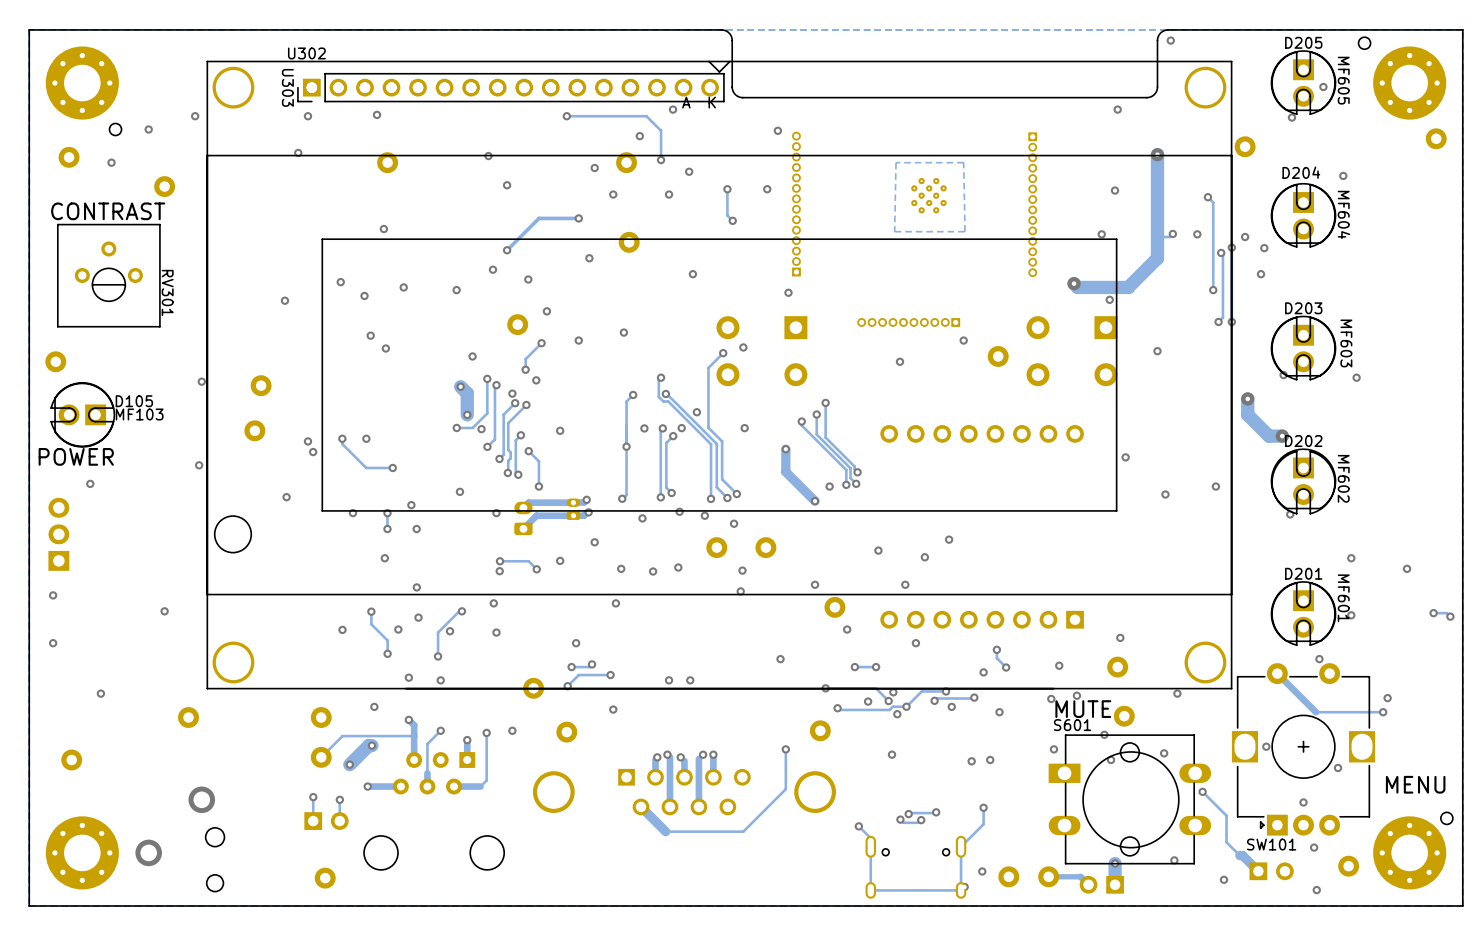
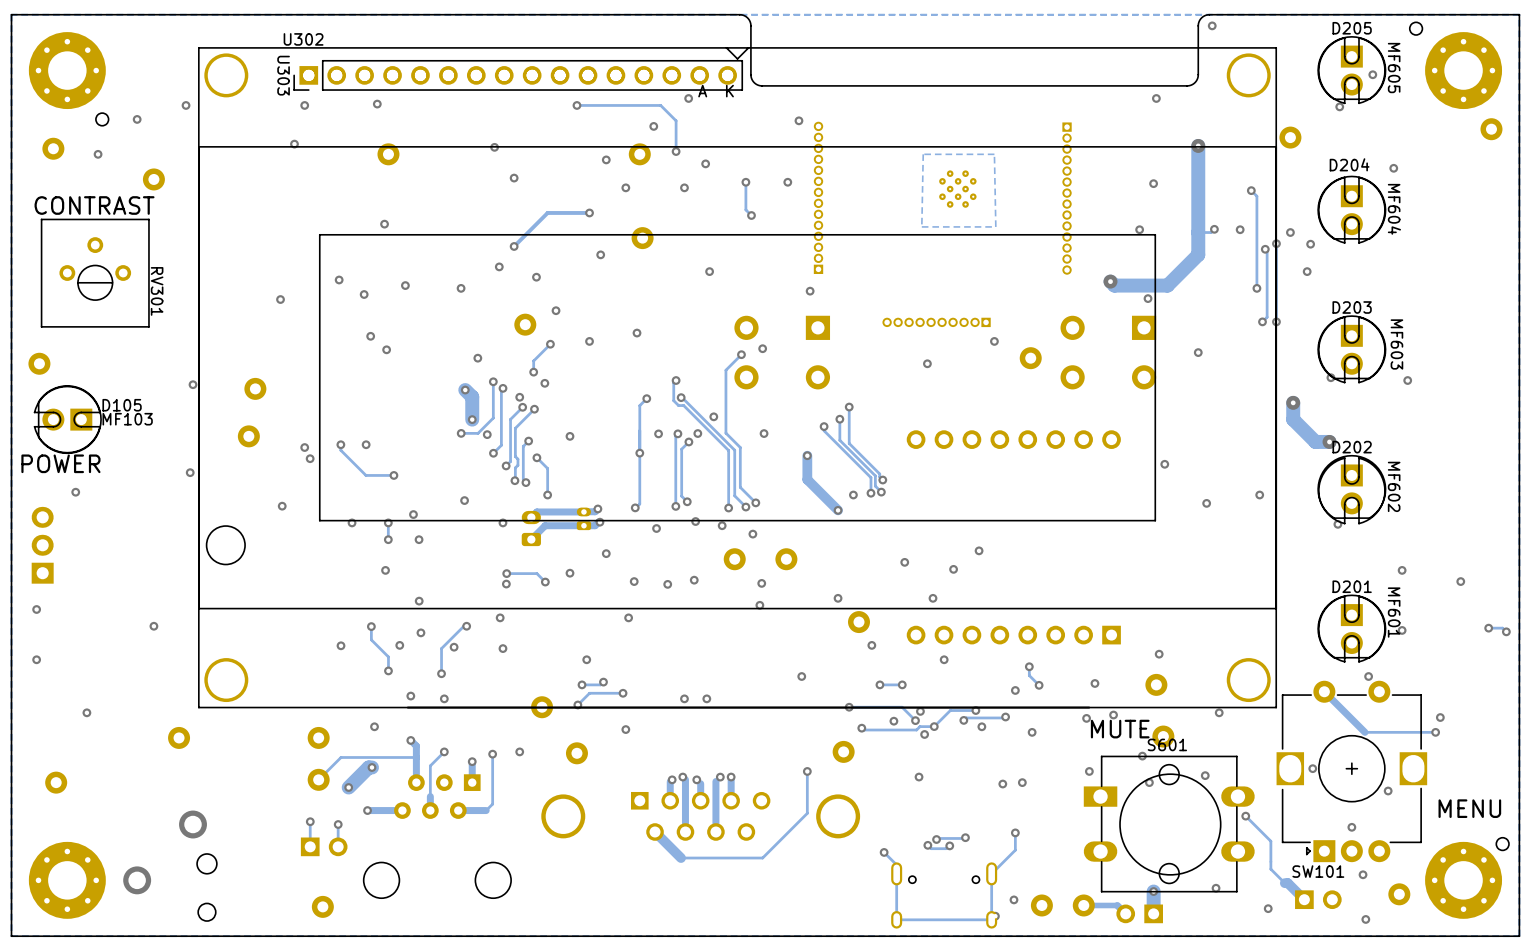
S601 name position: S601 (1072, 725) -> S601 (1167, 744)

